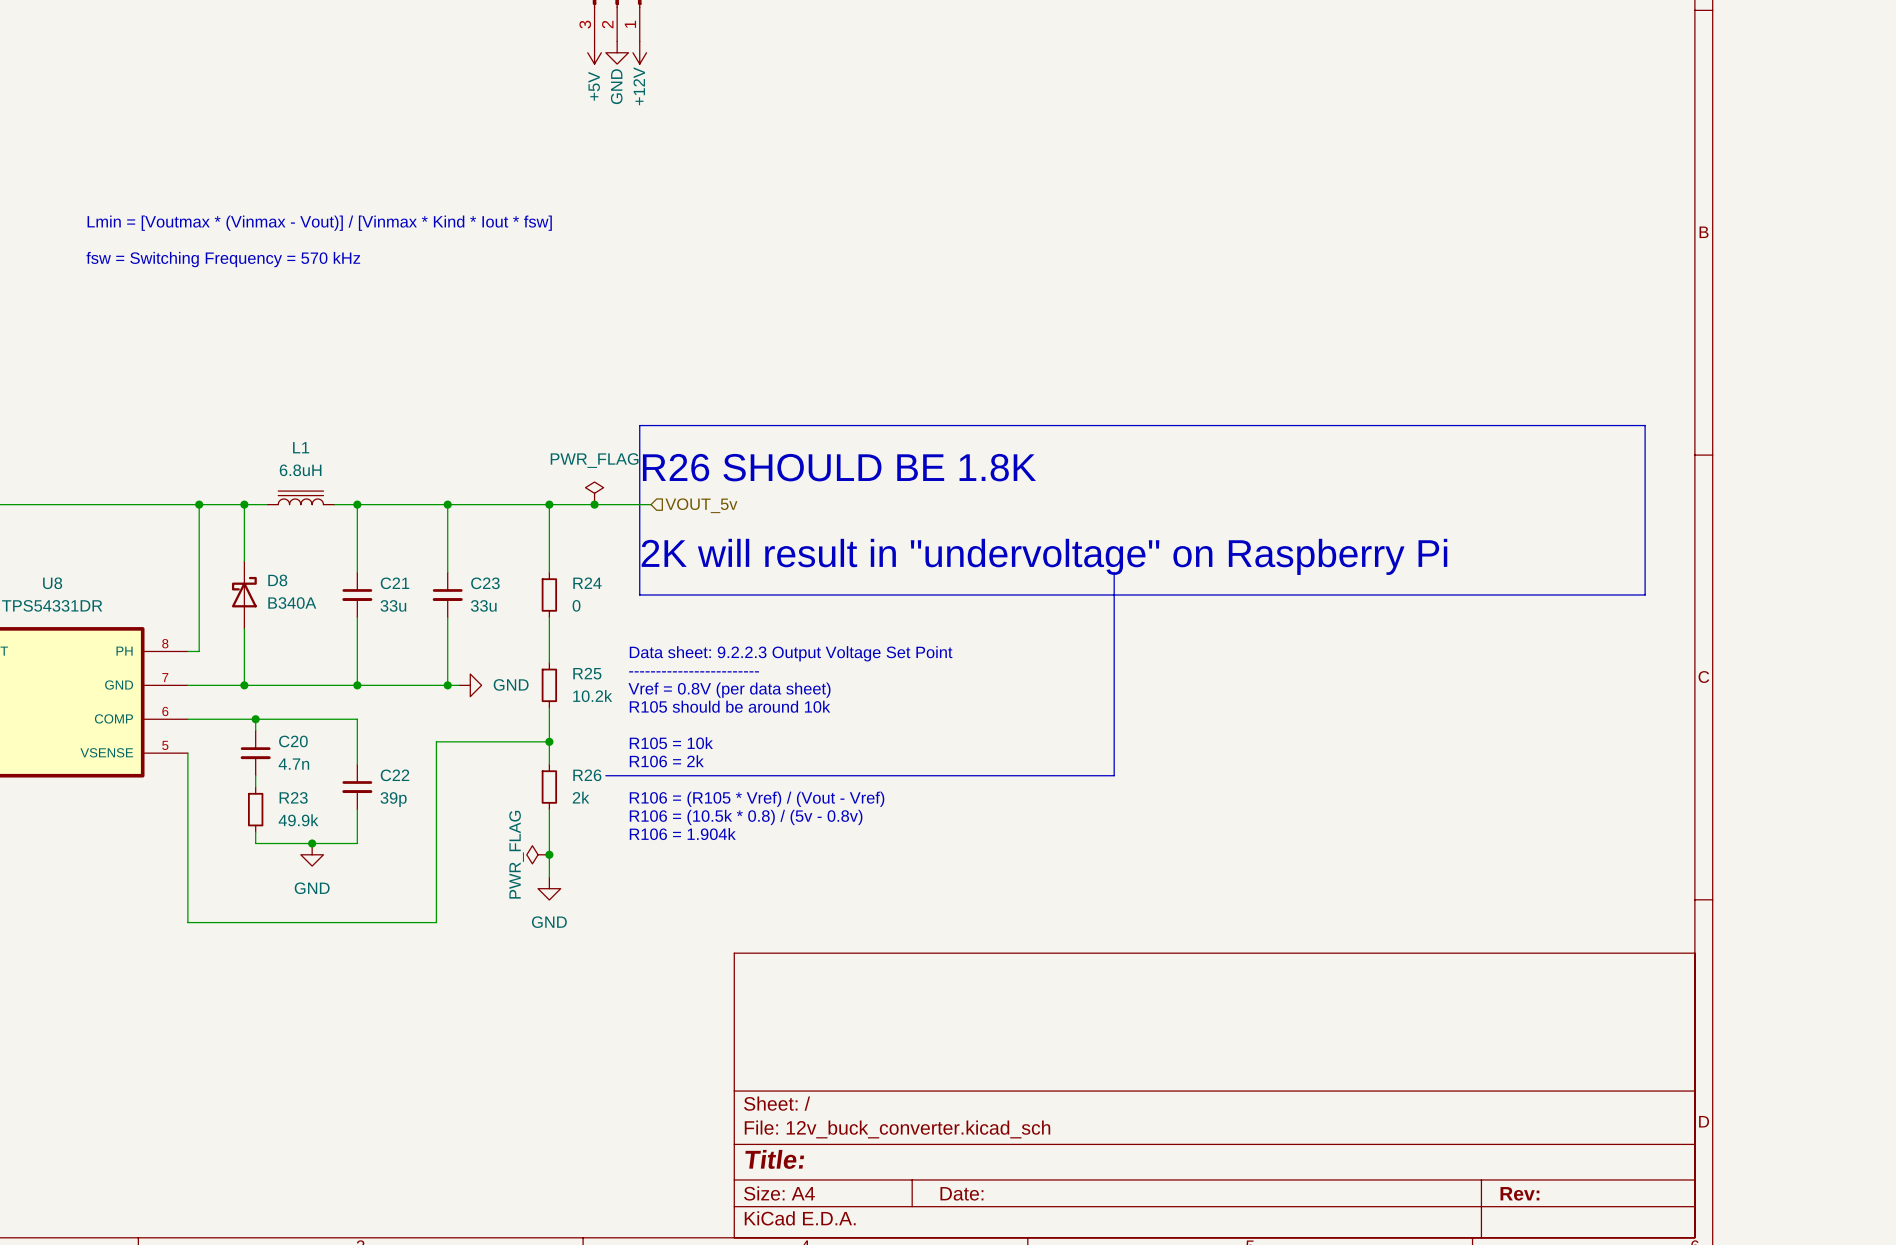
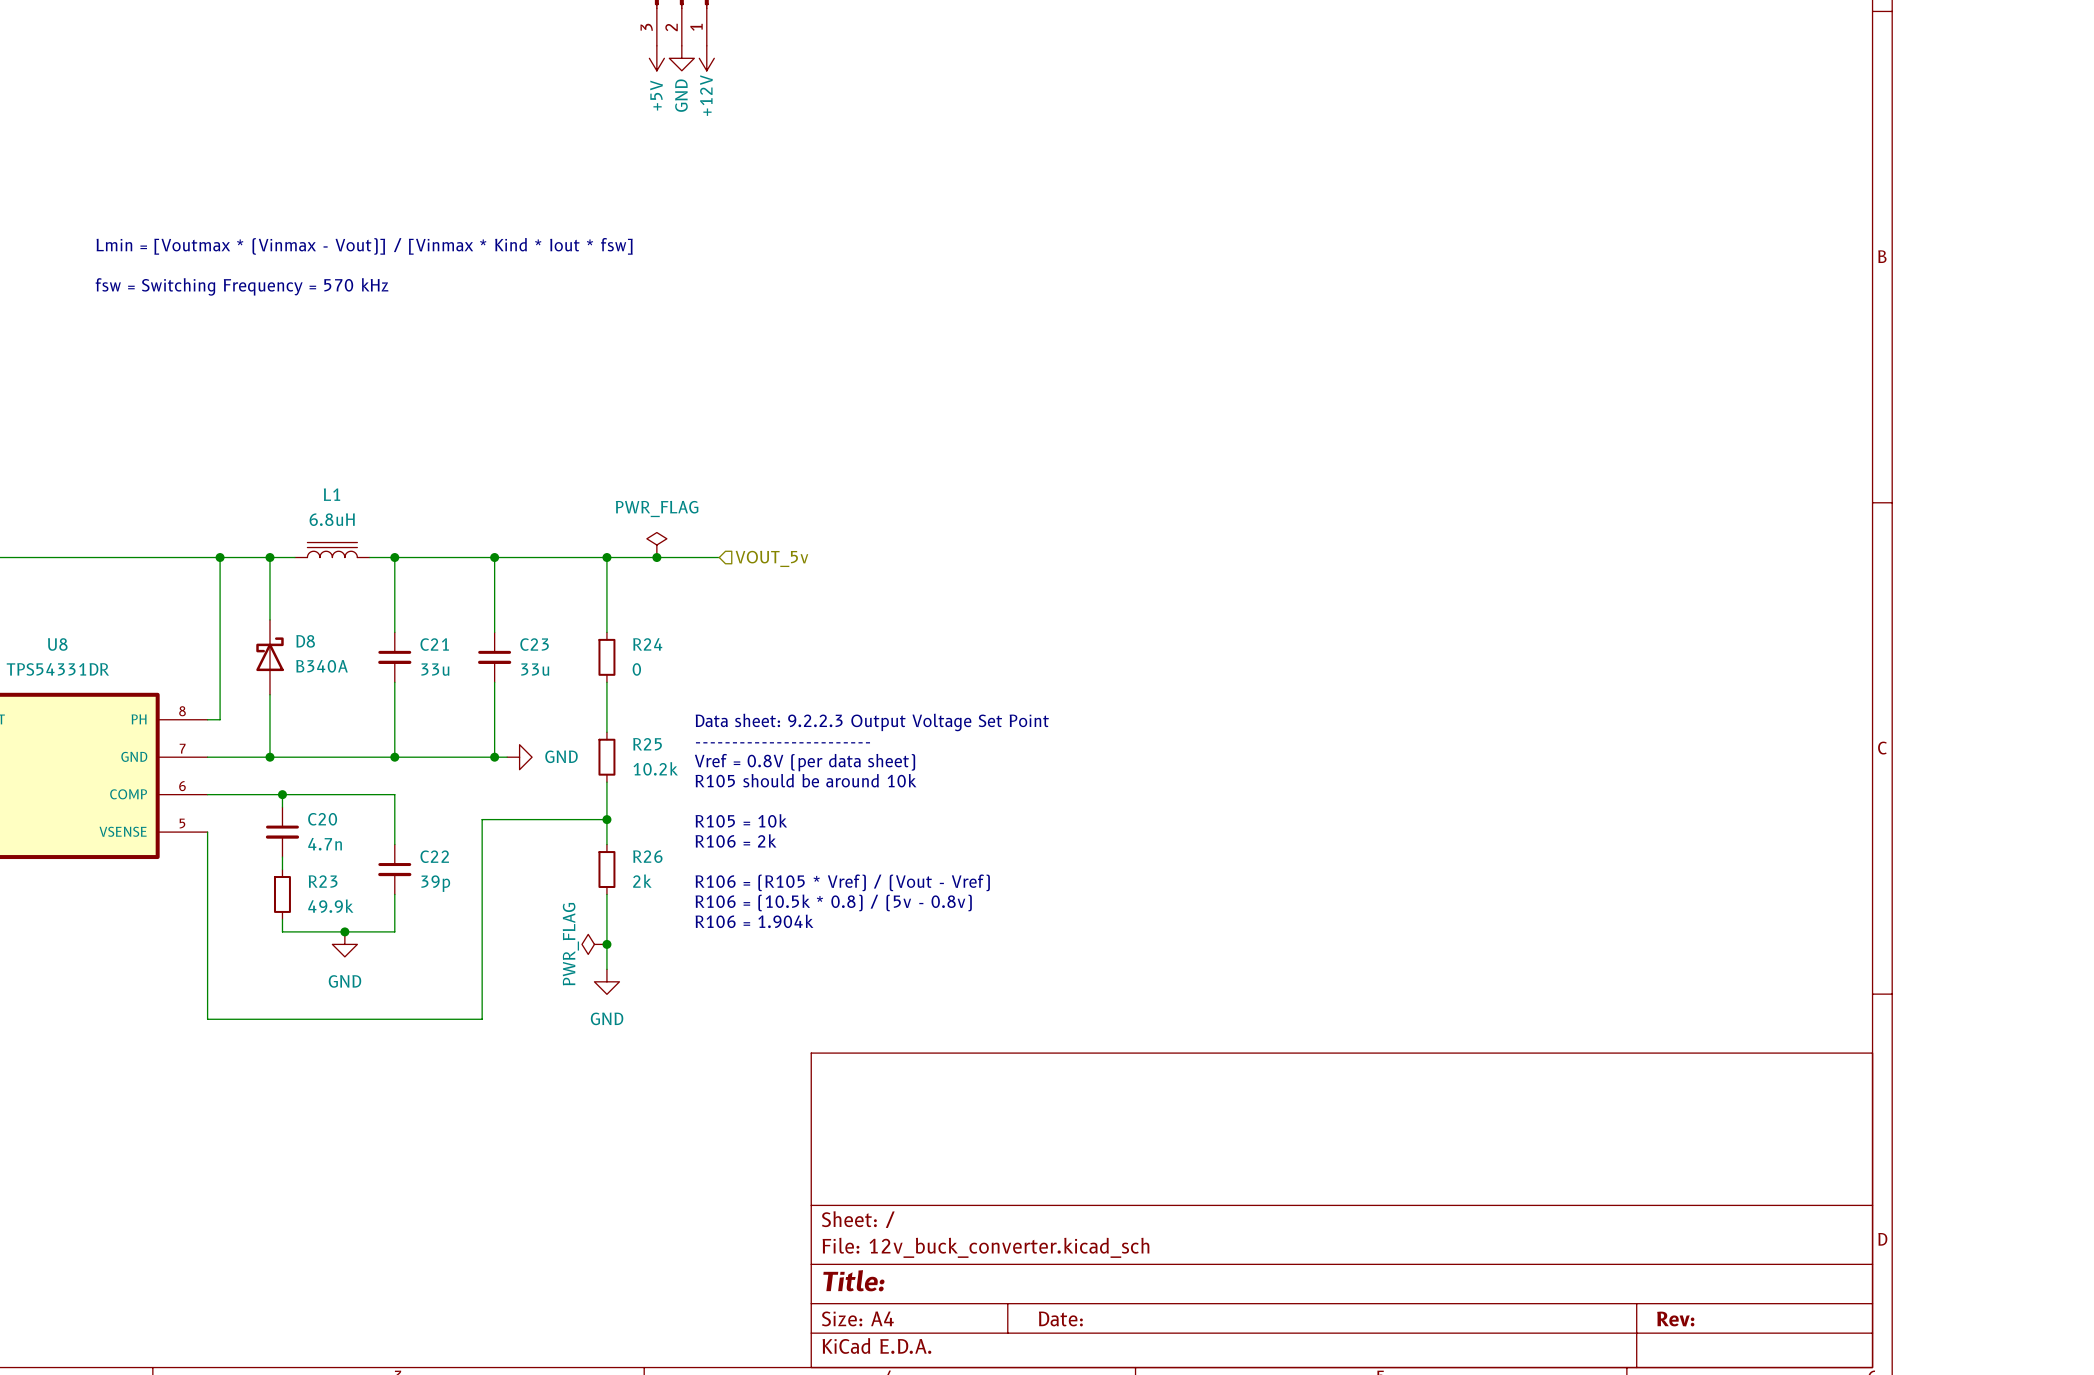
line: (639, 425) (1645, 425) (1645, 594) (639, 594) (639, 425) -> none
text: R26 SHOULD BE 1.8K (839, 467) -> none
text: 2K will result in "undervoltage" on Raspberry Pi (1044, 556) -> none
line: (1114, 572) (1114, 775) (605, 775) -> none

